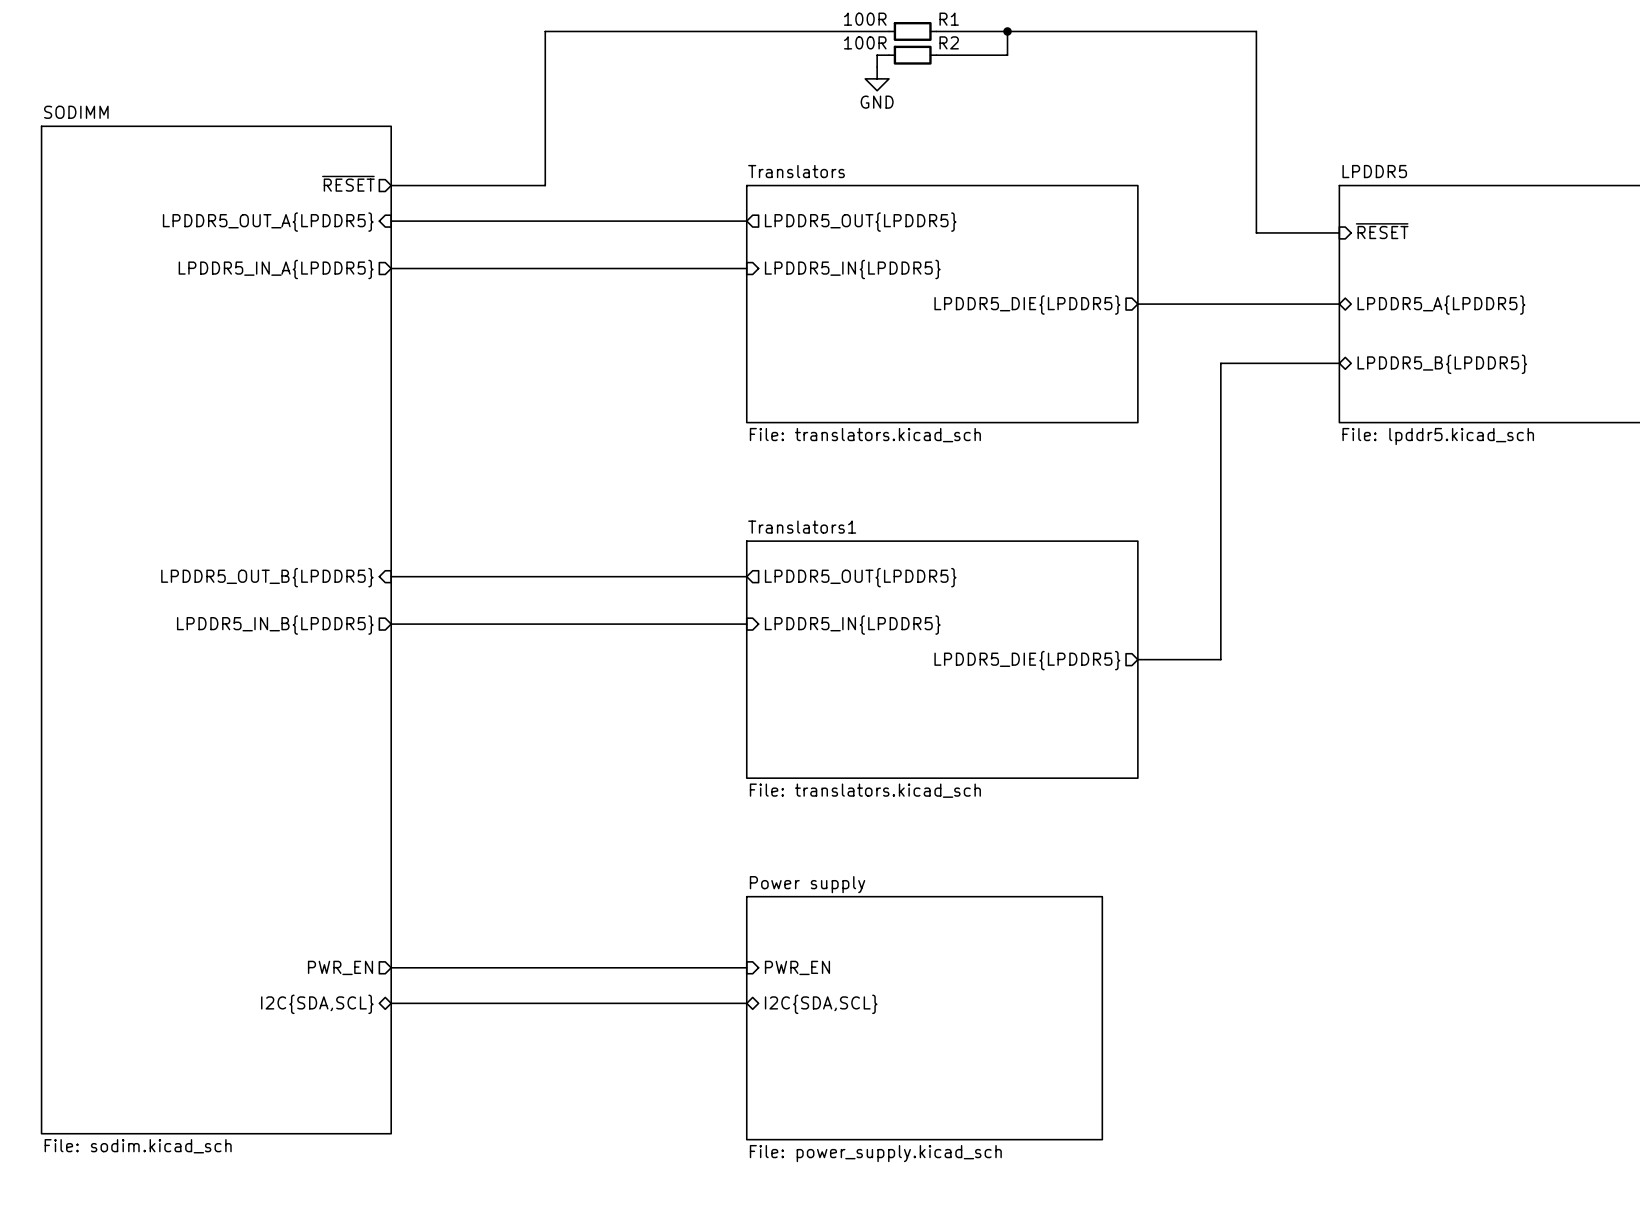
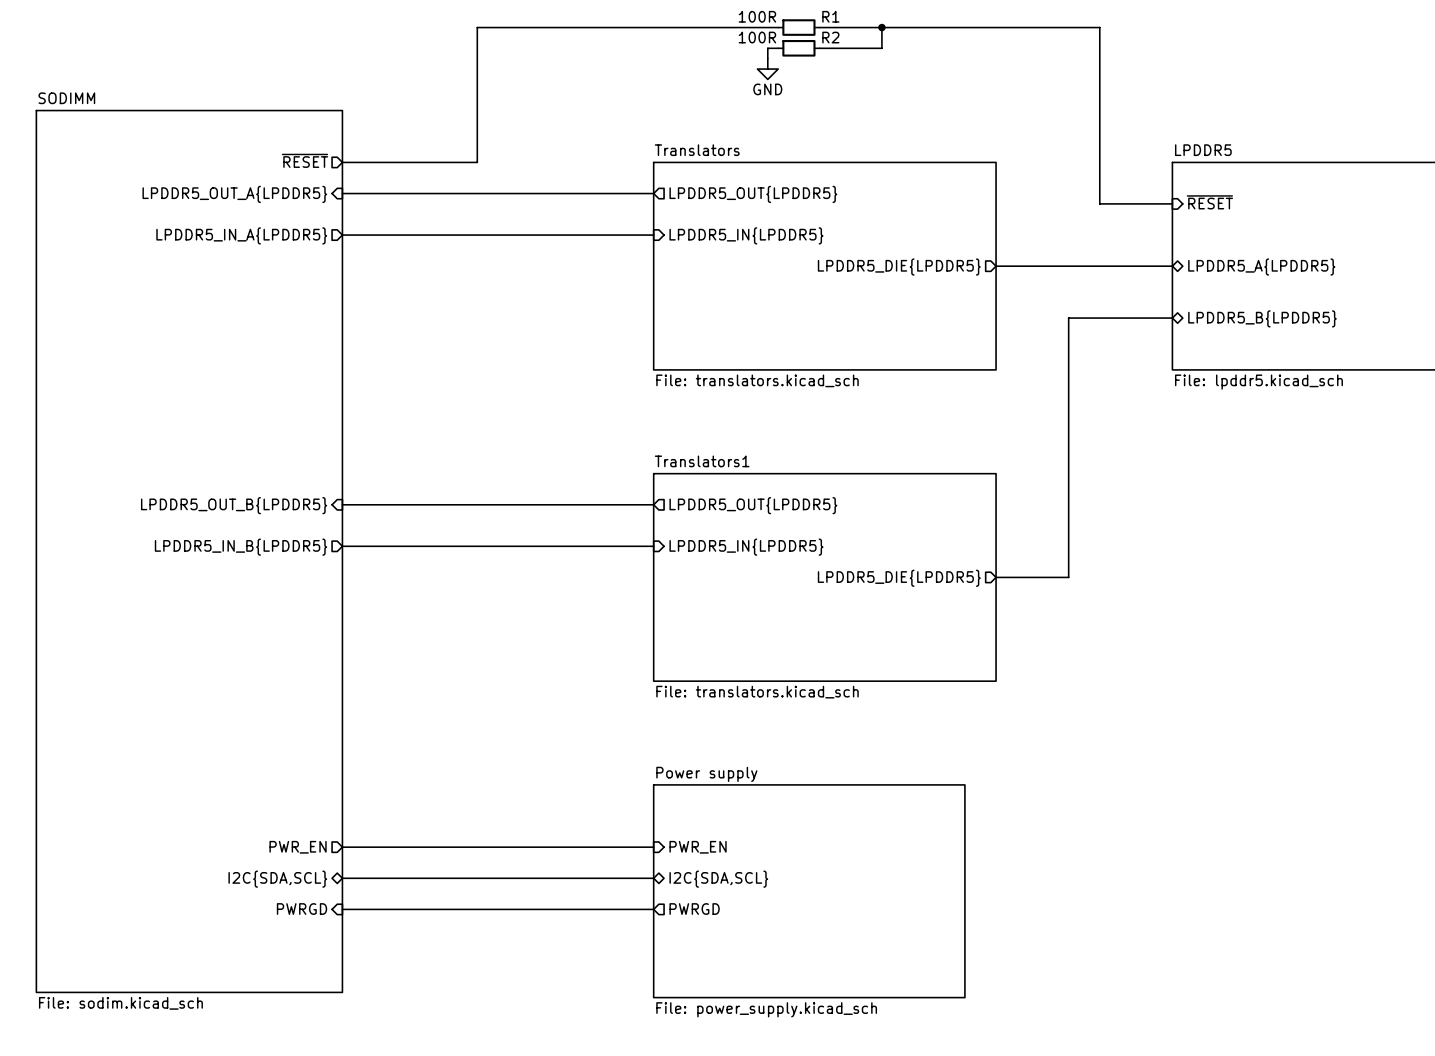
sheet pin: none -> PWRGD (302, 909)
wire: none -> (342, 909) (653, 909)
sheet pin: none -> PWRGD (694, 909)

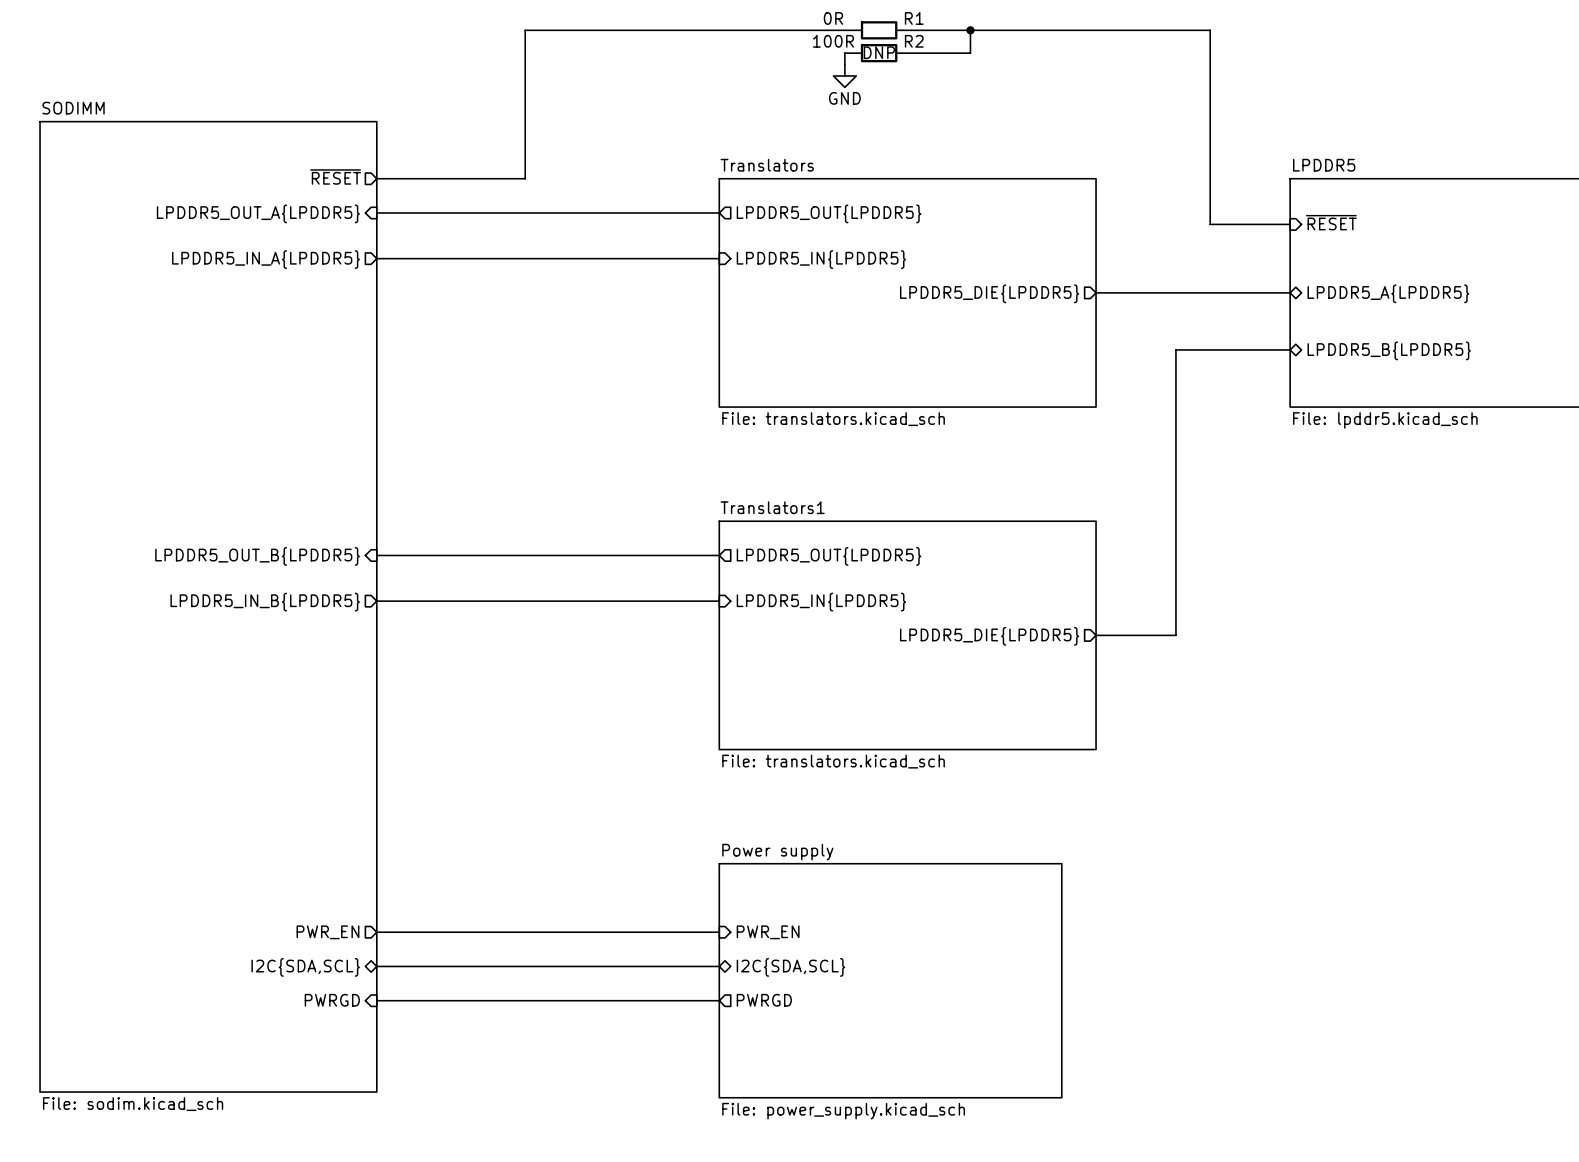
R1 text: 100R (757, 16) -> 0R (833, 18)
R2 text: none -> DNP (879, 52)

